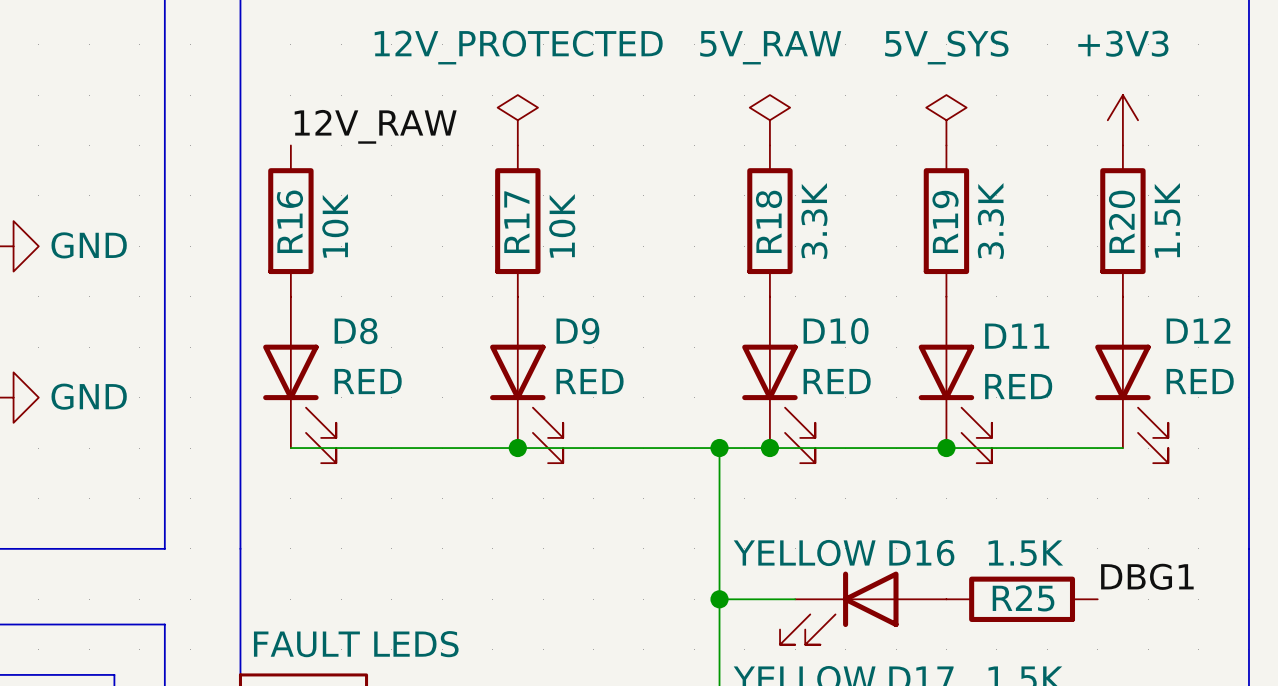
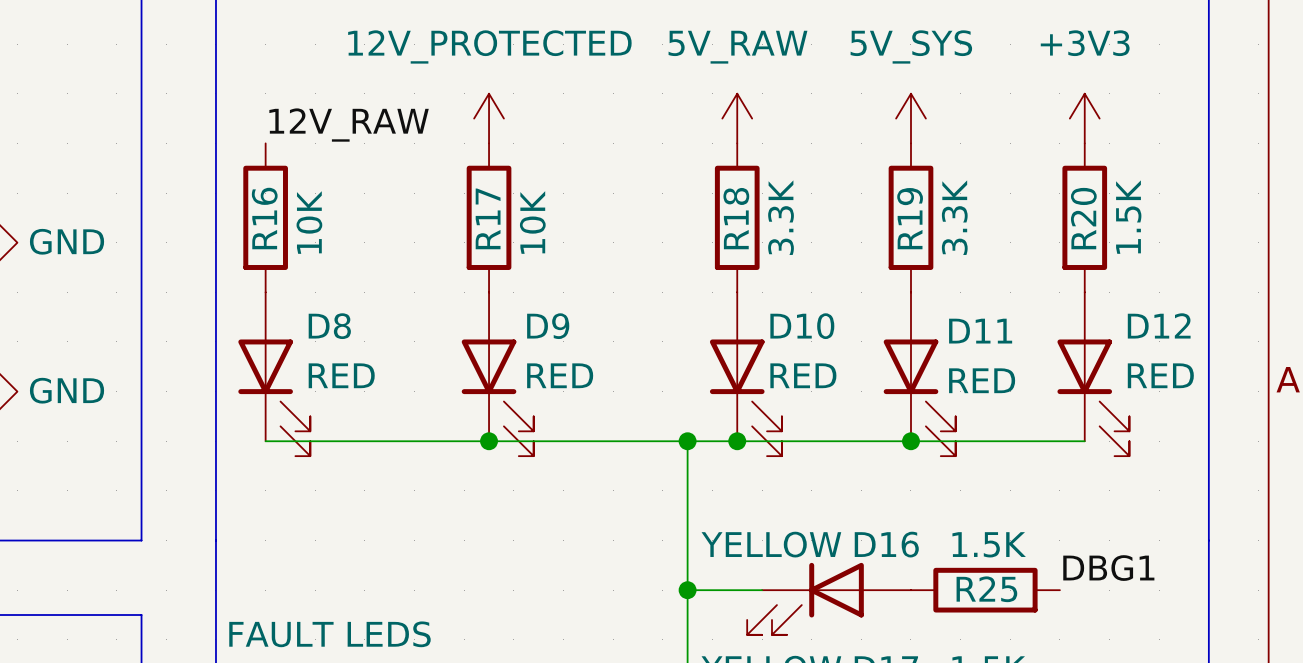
power symbol shape: [497, 95, 538, 146] -> [474, 93, 504, 144]
power symbol shape: [749, 95, 791, 146] -> [722, 93, 753, 144]
power symbol shape: [926, 95, 967, 146] -> [896, 93, 926, 144]

